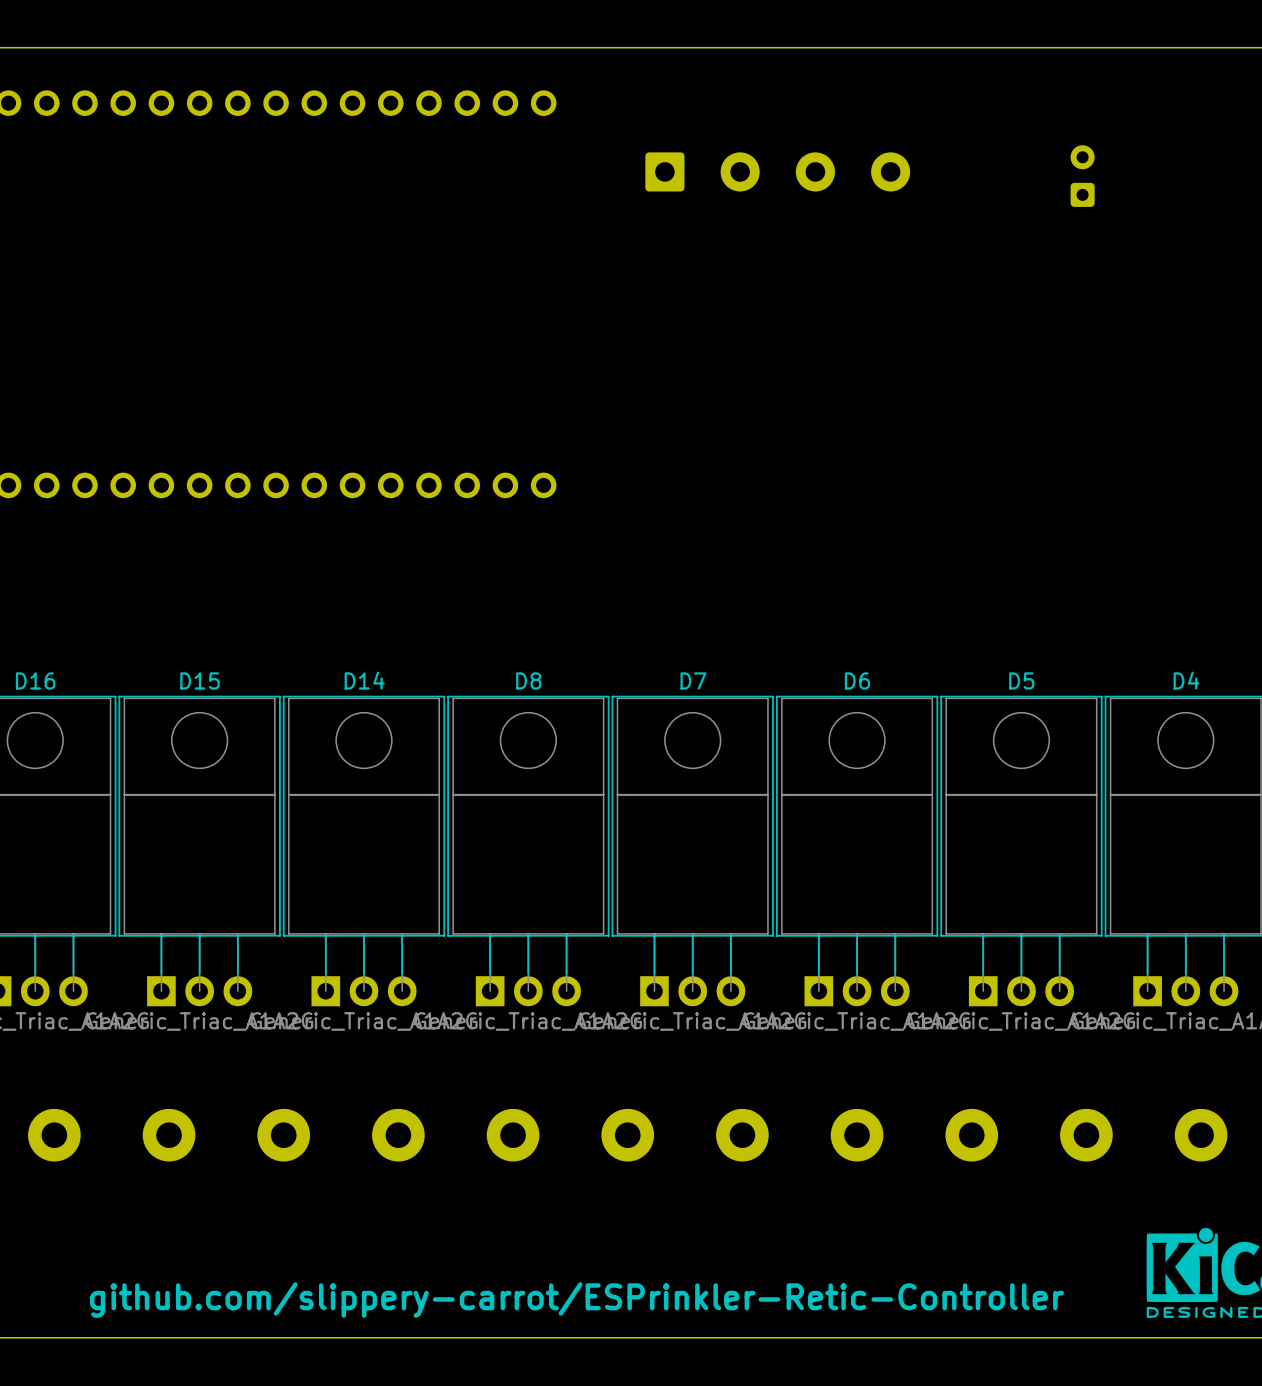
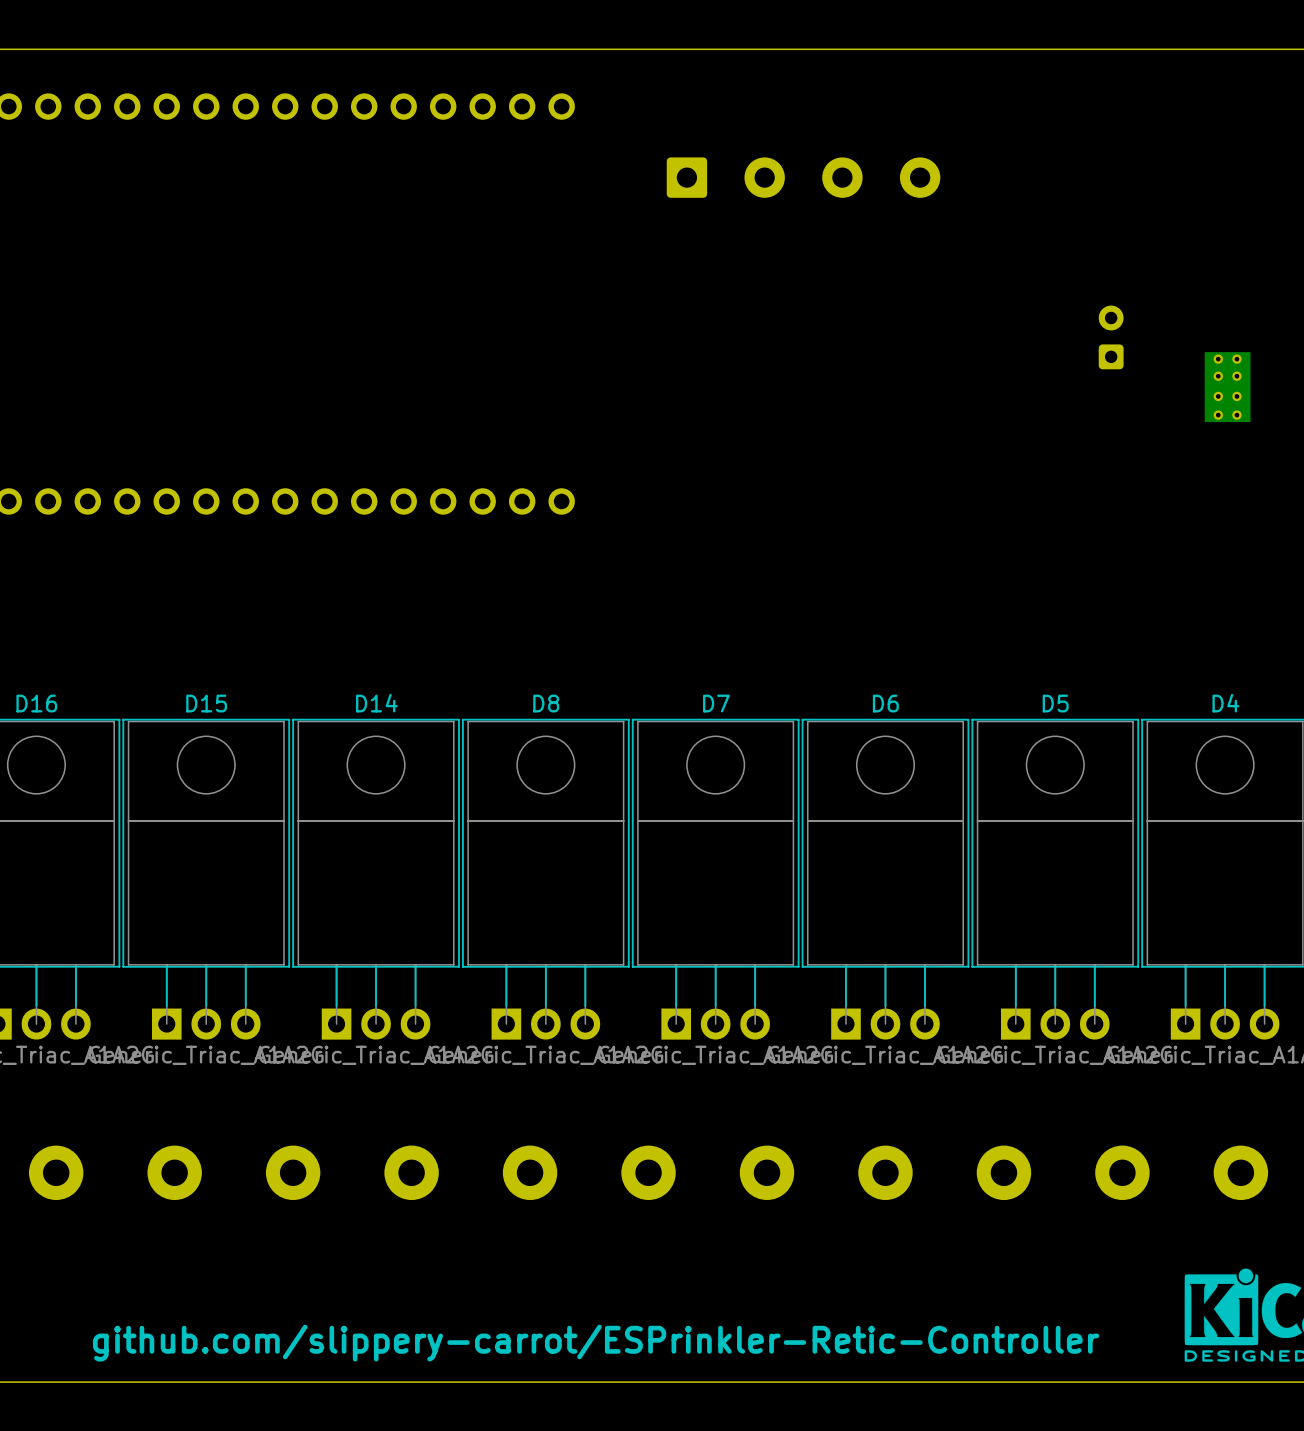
part position: (1082, 176) -> (1111, 337)
part: none -> (1227, 387)

